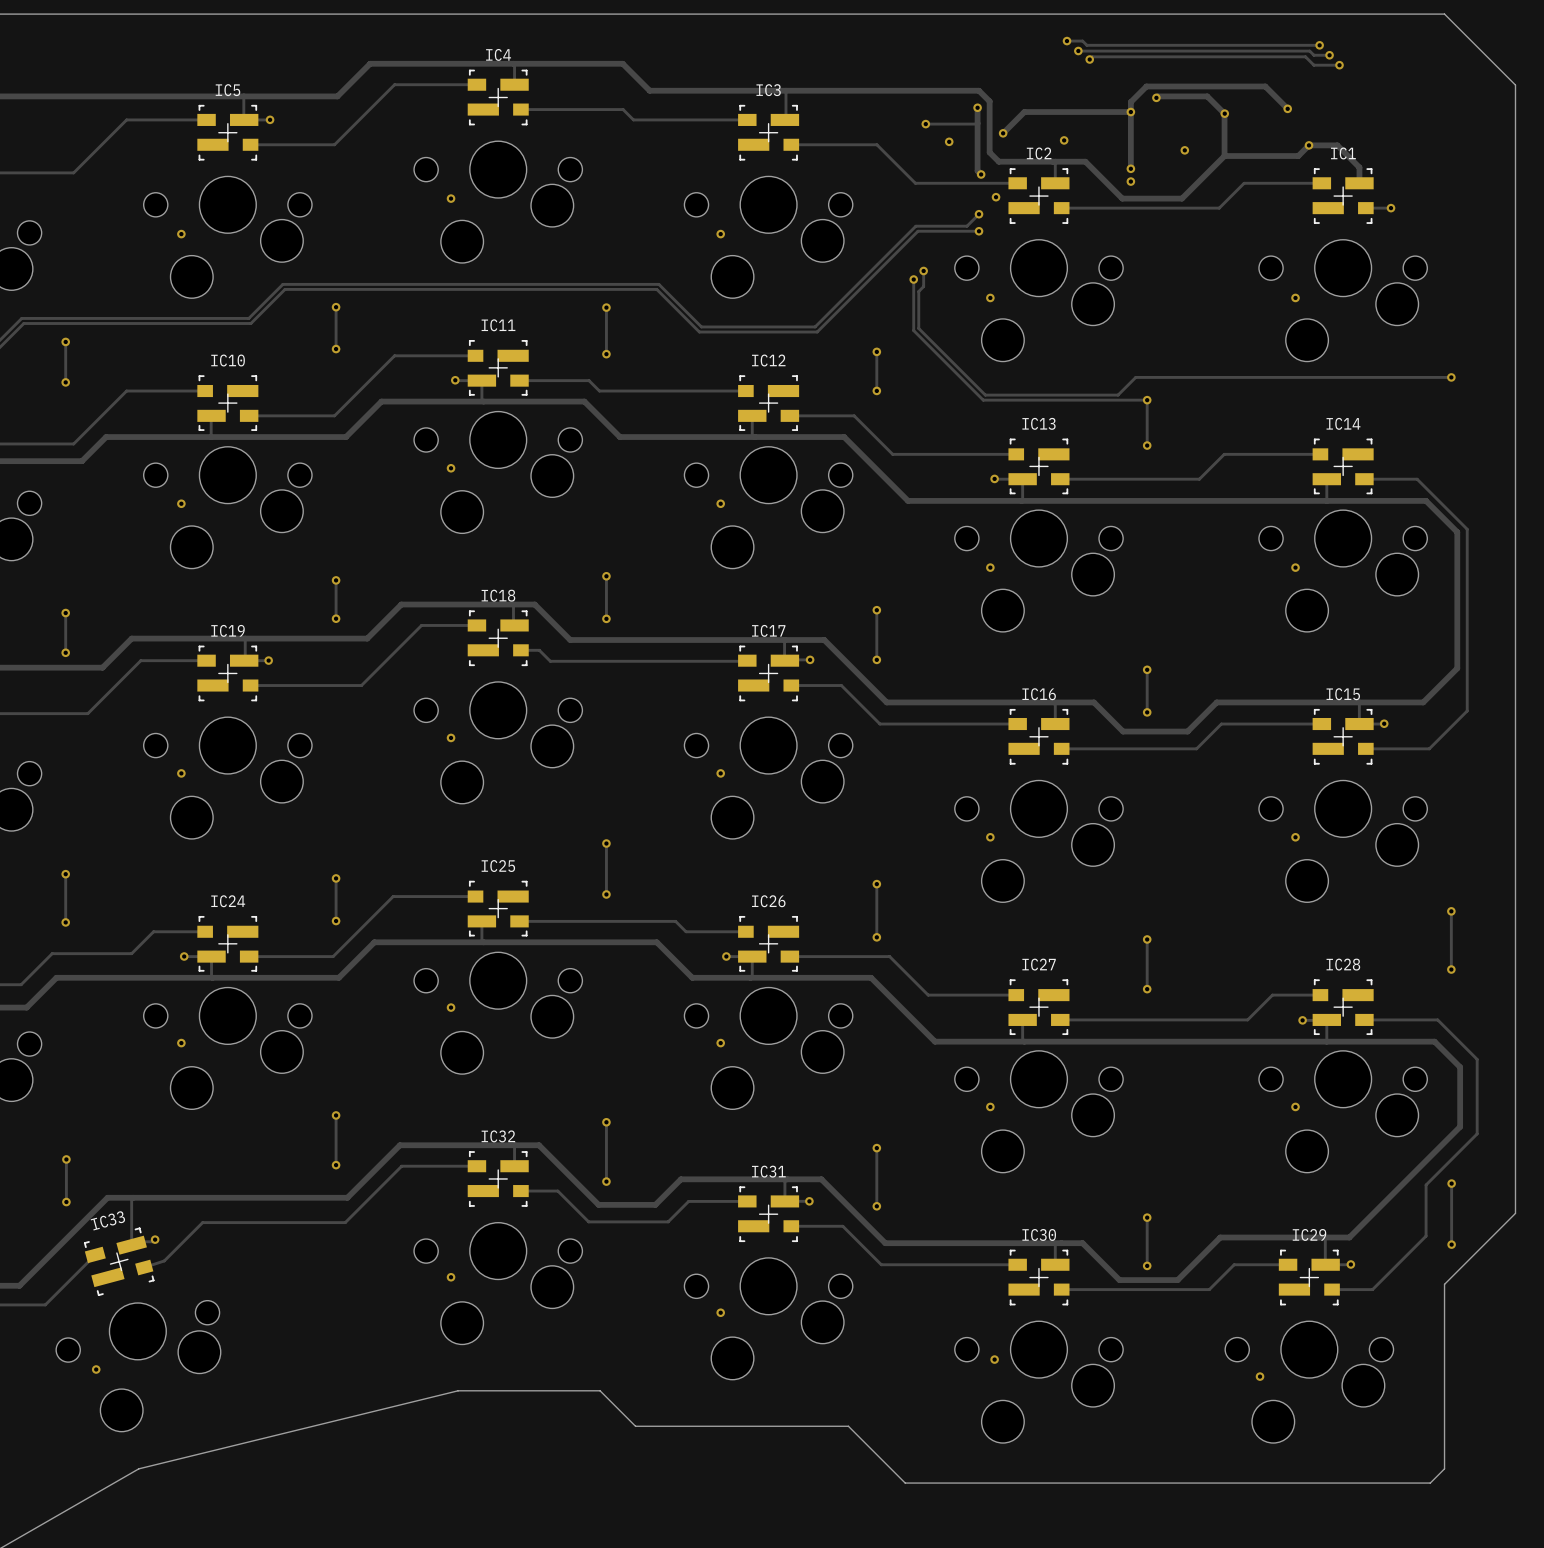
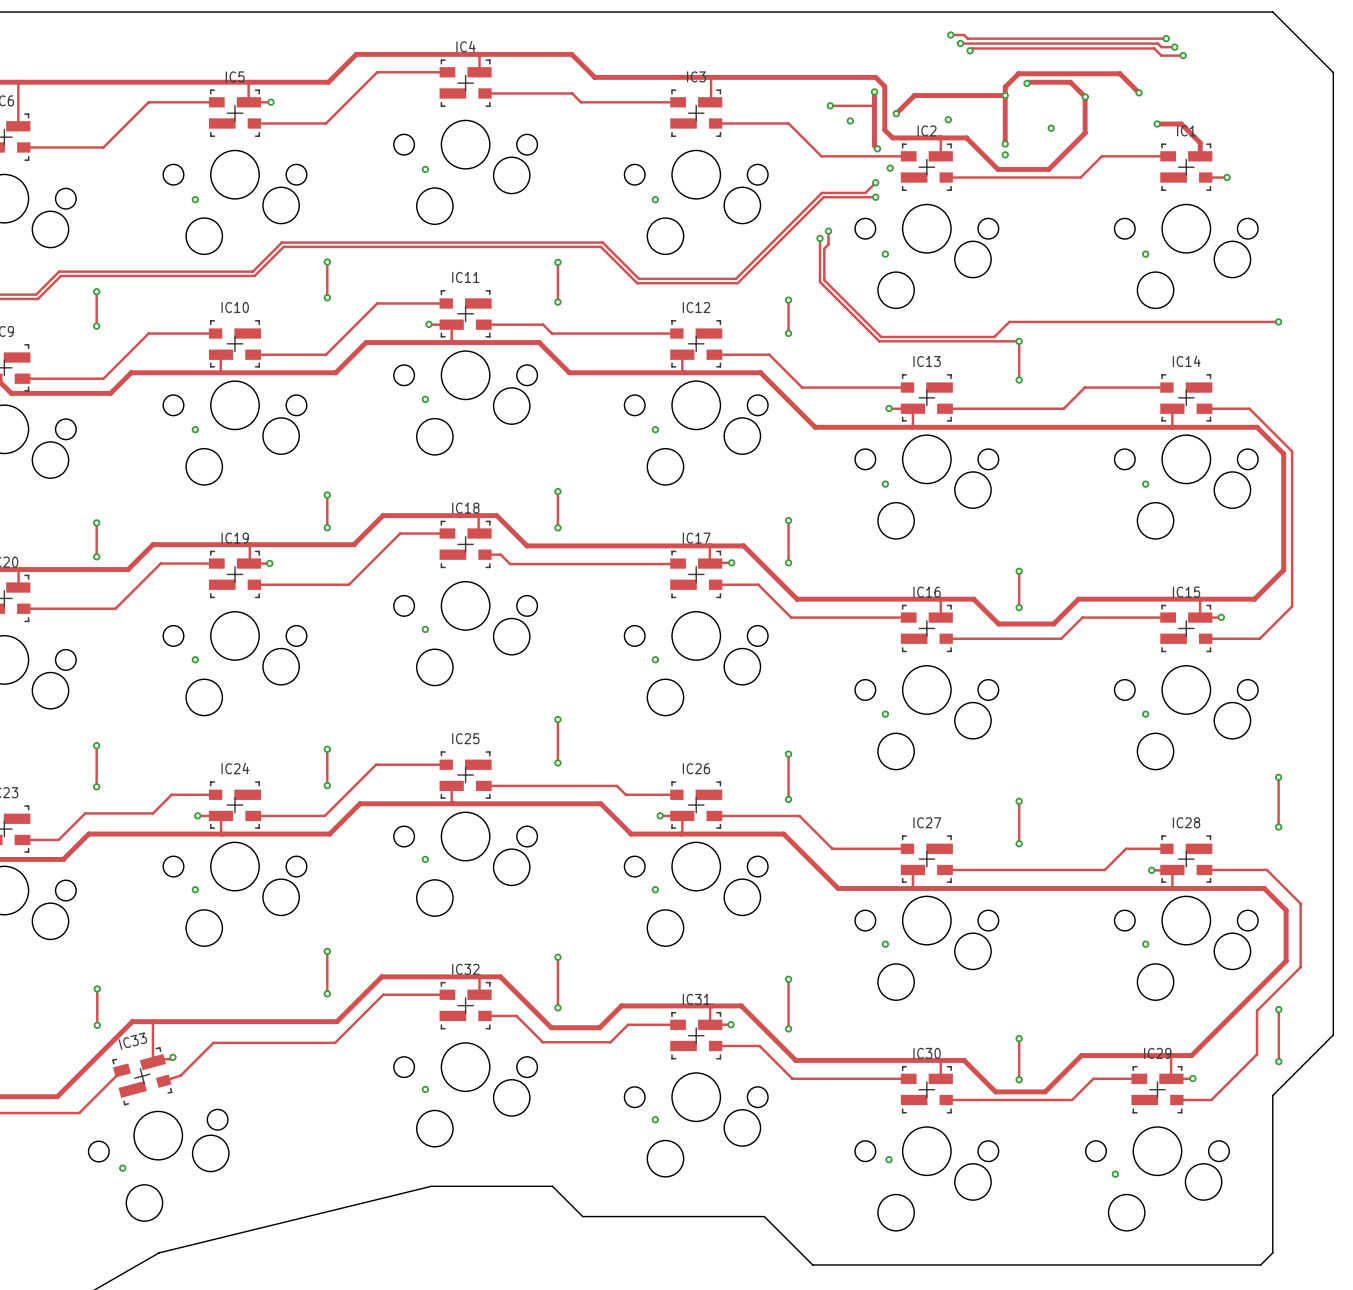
track: (1308, 145) (1298, 156) (1224, 156) -> none

